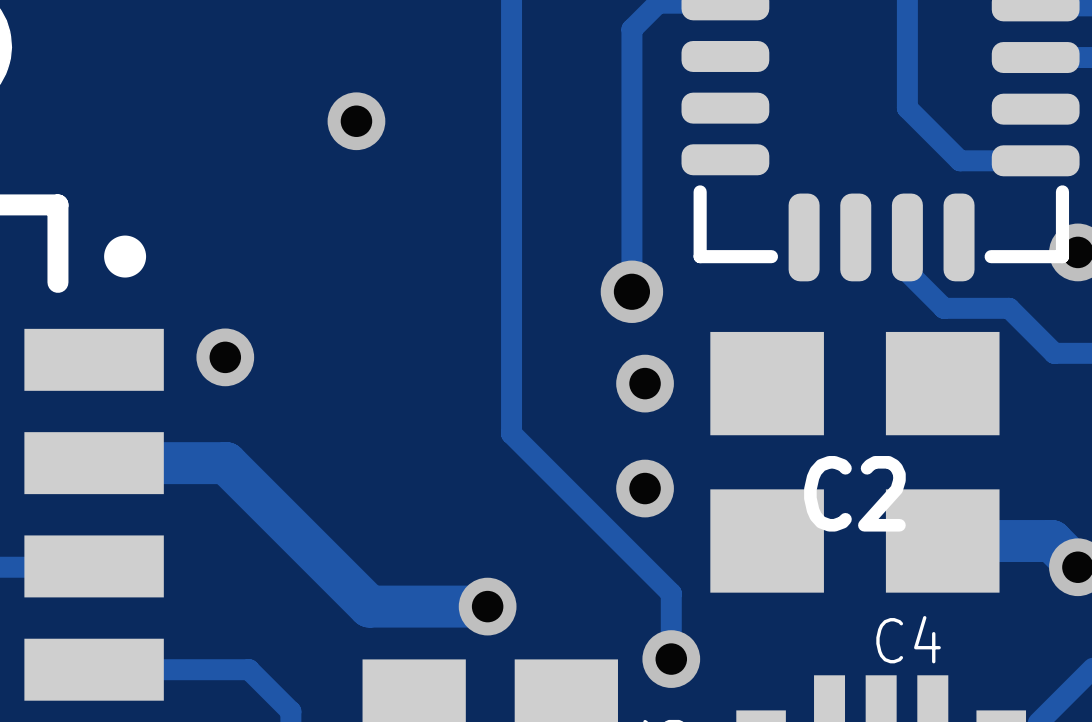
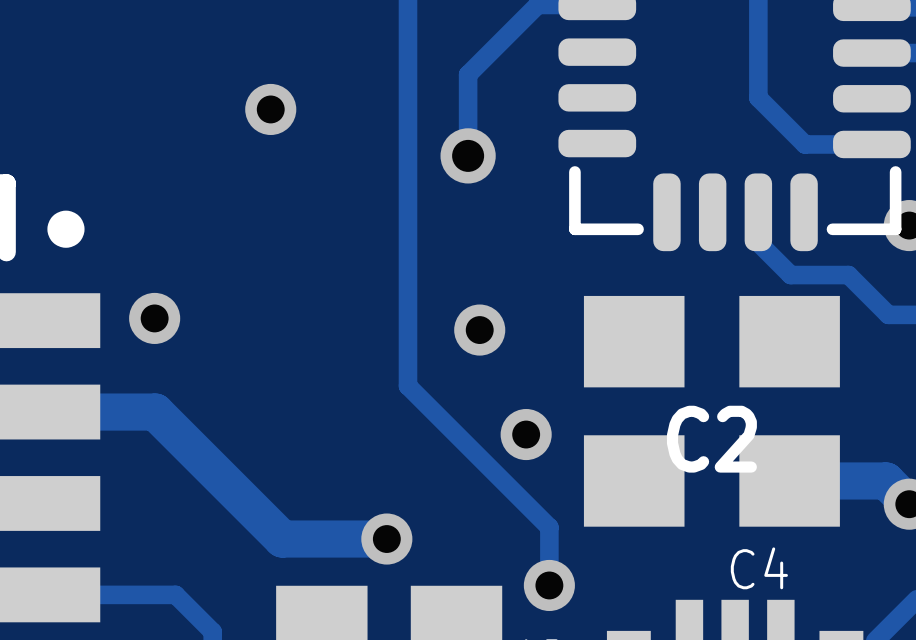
track: (631, 29) (631, 291) -> (514, 28) (468, 74) (468, 155)
via position: (631, 291) -> (468, 155)
via position: (645, 383) -> (479, 330)

